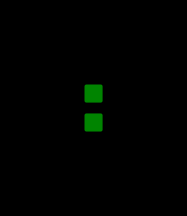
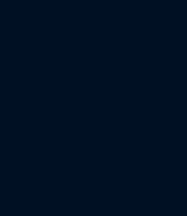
part: (93, 108) -> none

